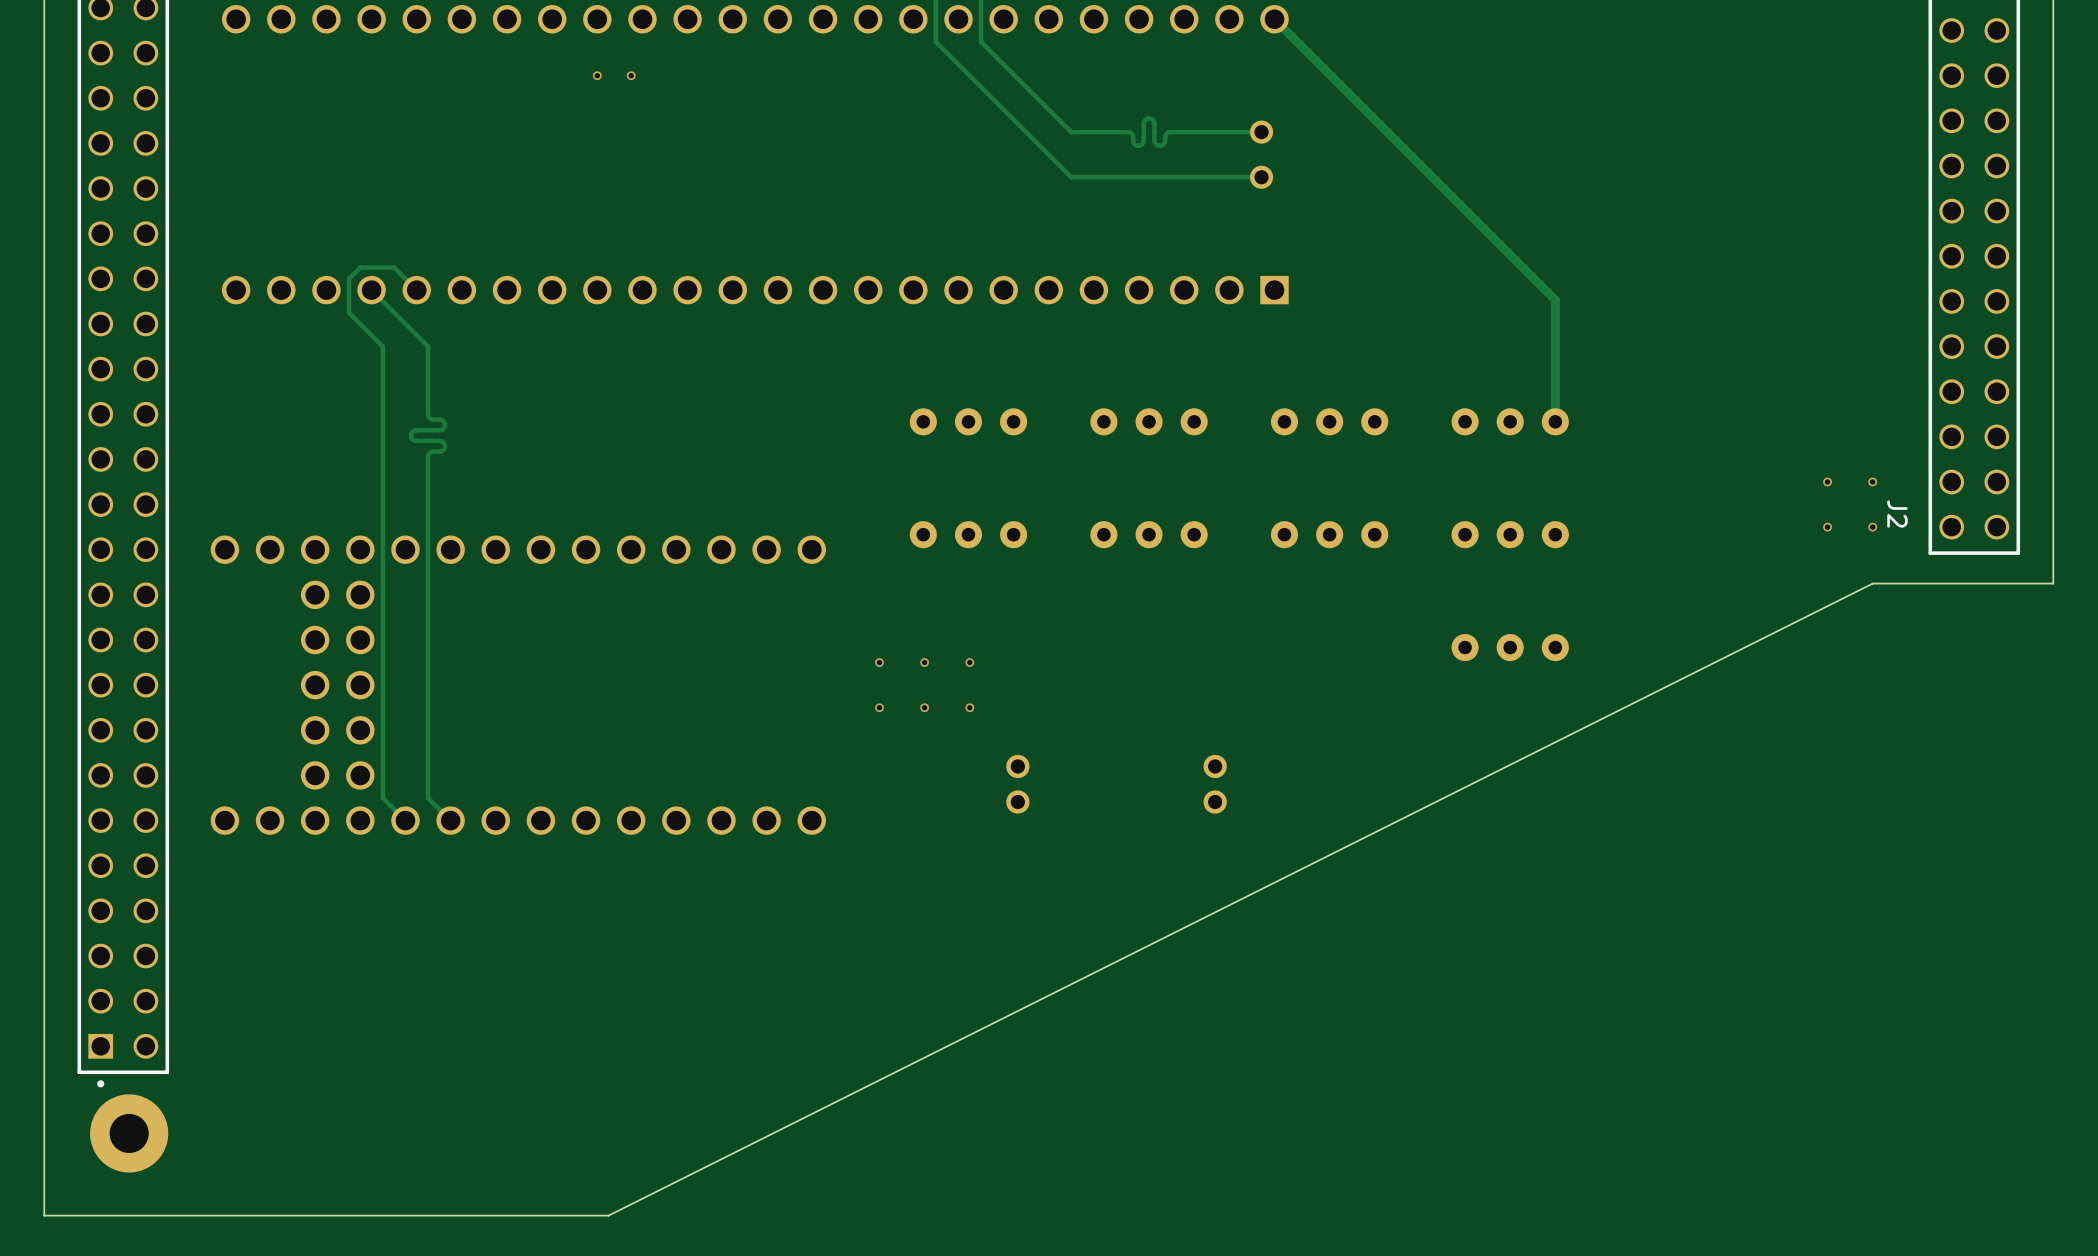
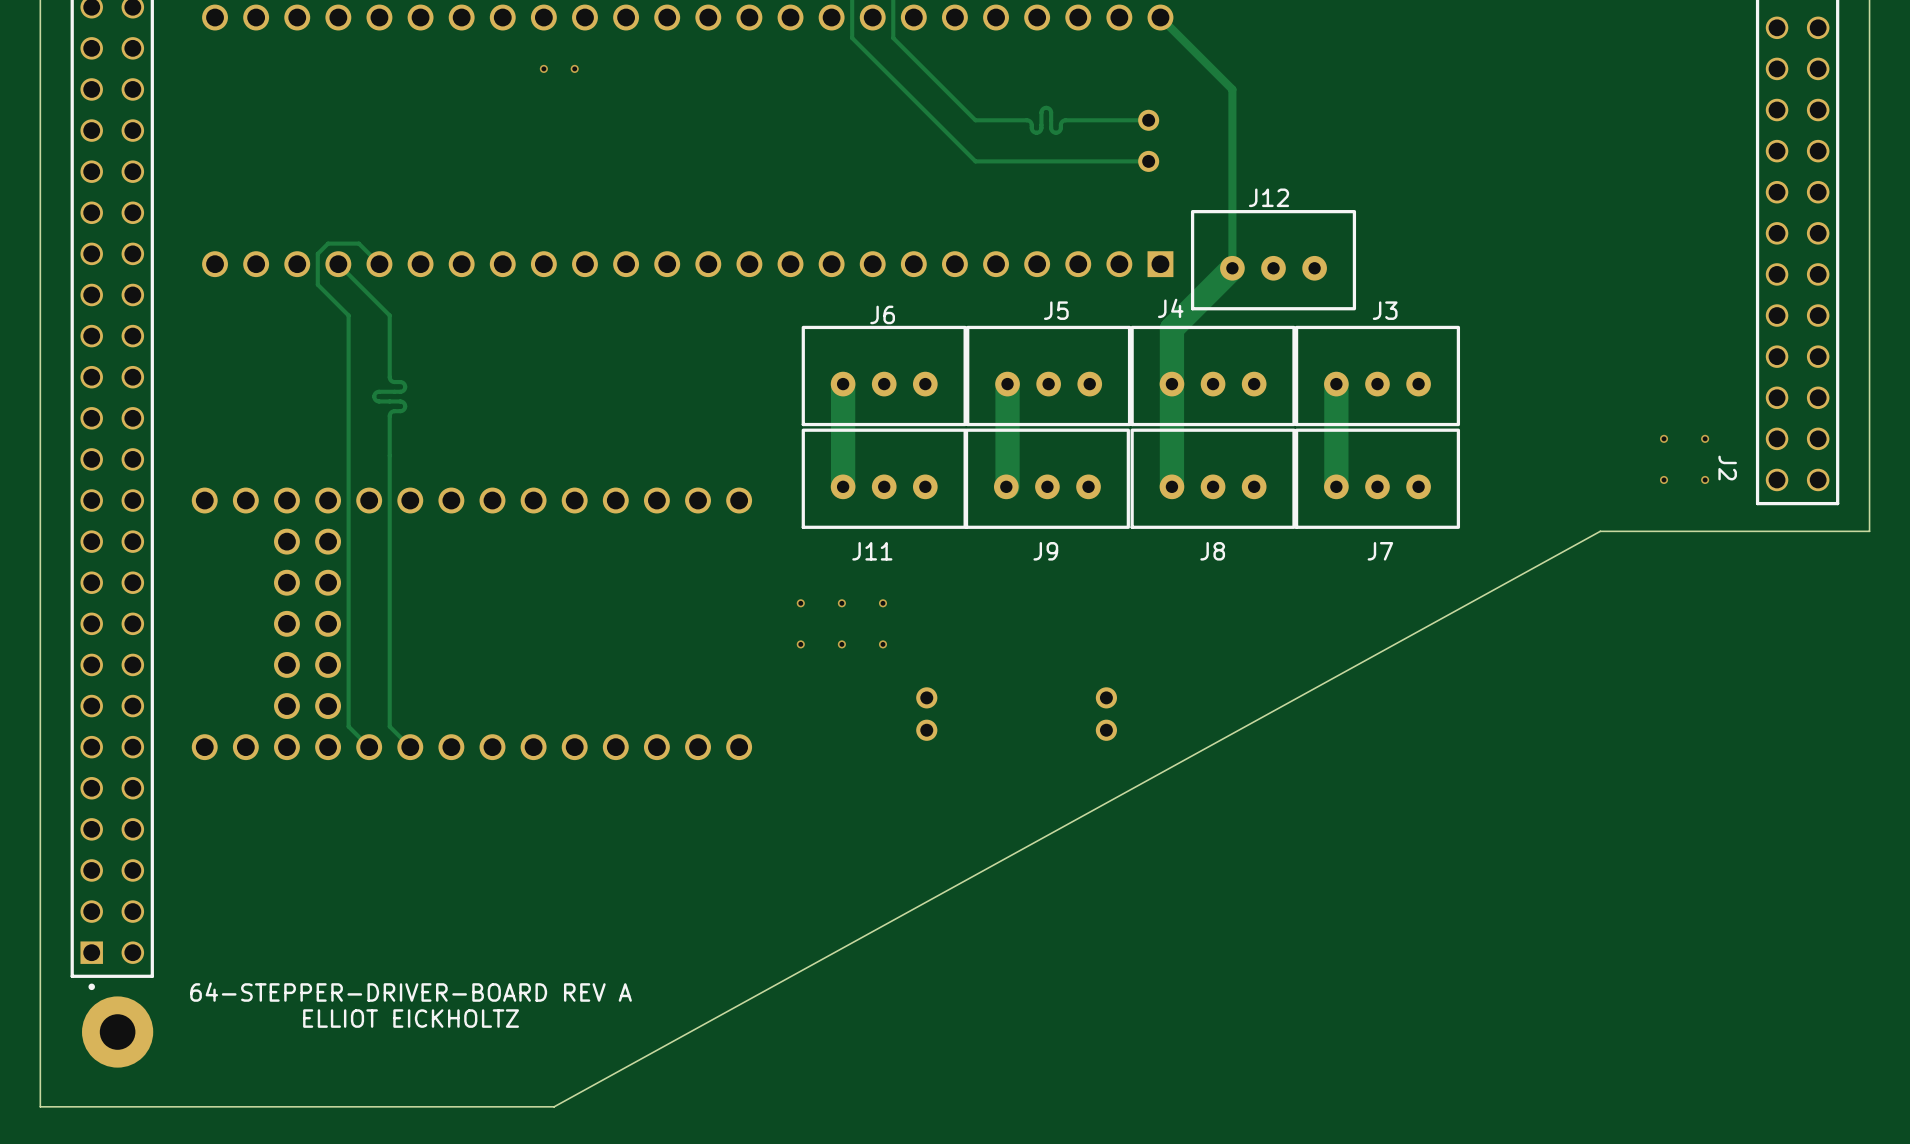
track: (1353, 98) (1555, 300) (1555, 421) -> (1232, 89) (1232, 268) (1171, 328) (1171, 486)
track: none -> (843, 384) (843, 486)
J6 side: top (968, 421) -> bottom (884, 375)
track: none -> (1007, 384) (1007, 486)
J5 side: top (1149, 421) -> bottom (1048, 375)
J4 side: top (1329, 421) -> bottom (1213, 375)
track: none -> (1336, 384) (1336, 486)
J3 side: top (1510, 421) -> bottom (1377, 375)
J11 side: top (968, 534) -> bottom (884, 478)
J9 side: top (1149, 534) -> bottom (1047, 478)
J8 side: top (1329, 534) -> bottom (1213, 478)
J7 side: top (1510, 534) -> bottom (1377, 478)
board edge: (1872, 583) (608, 1215) -> (1705, 531) (1600, 531) (554, 1106)
J12 side: top (1510, 647) -> bottom (1273, 260)
text: none -> 64-STEPPER-DRIVER-BOARD REV A (411, 992)
text: none -> ELLIOT EICKHOLTZ (411, 1018)

